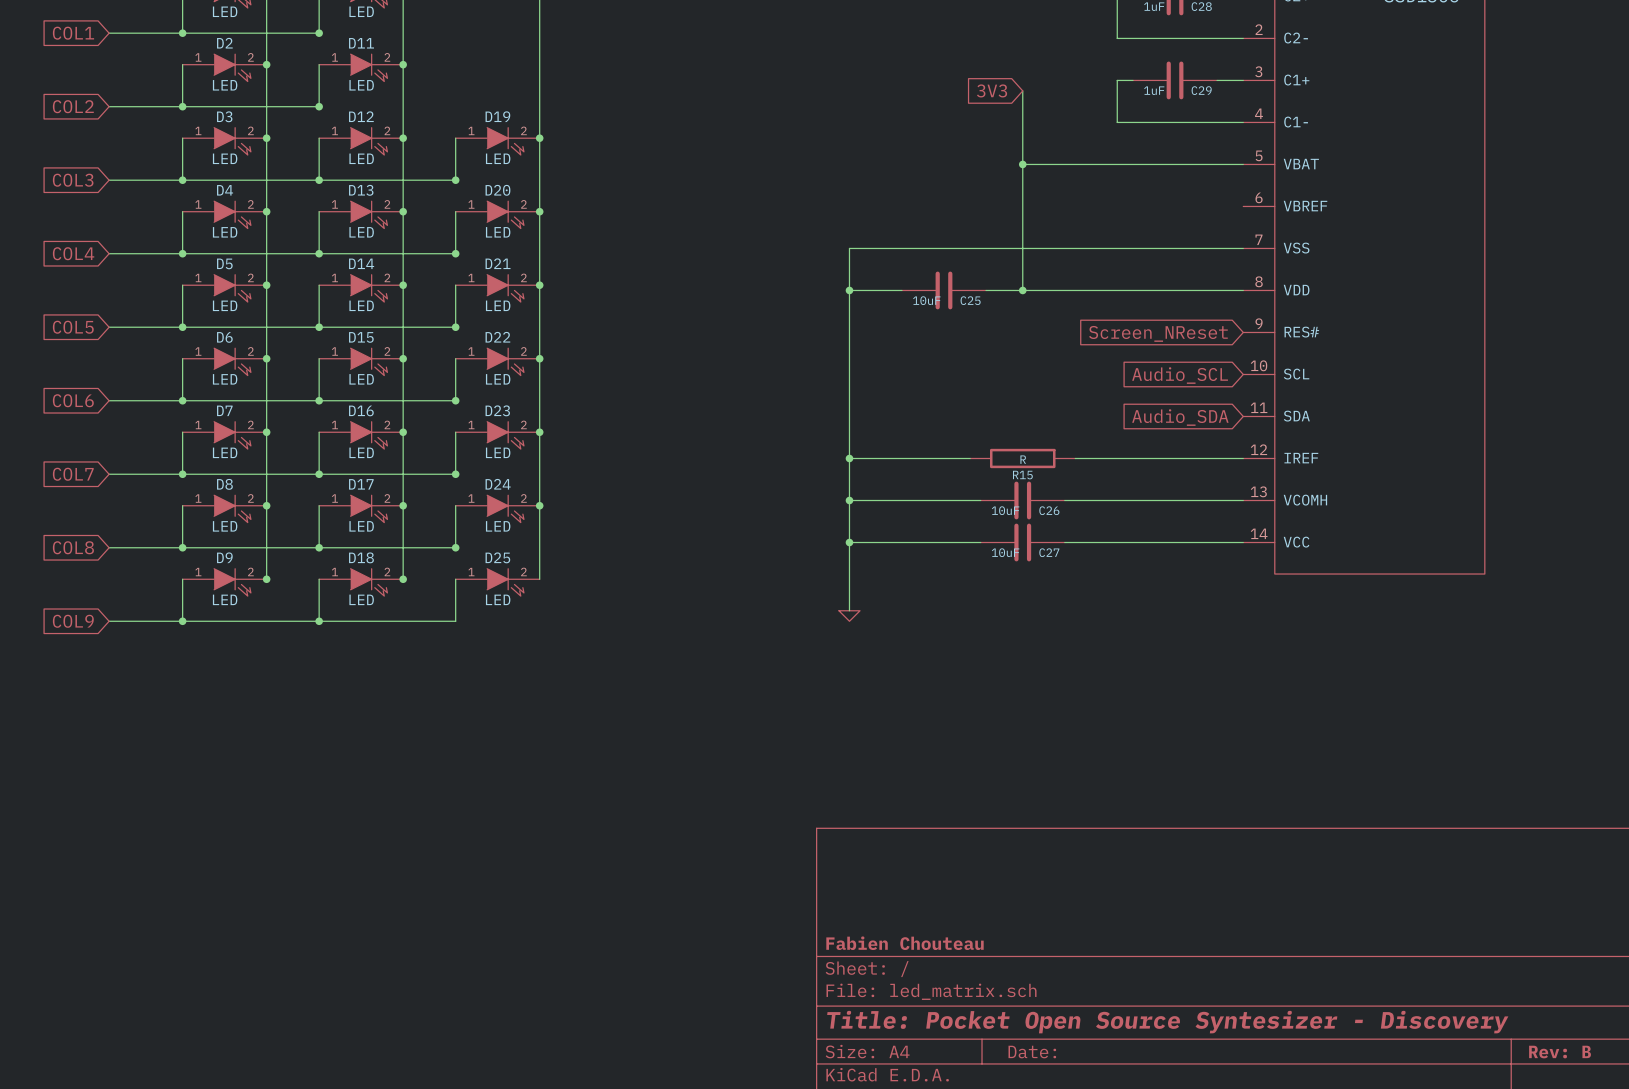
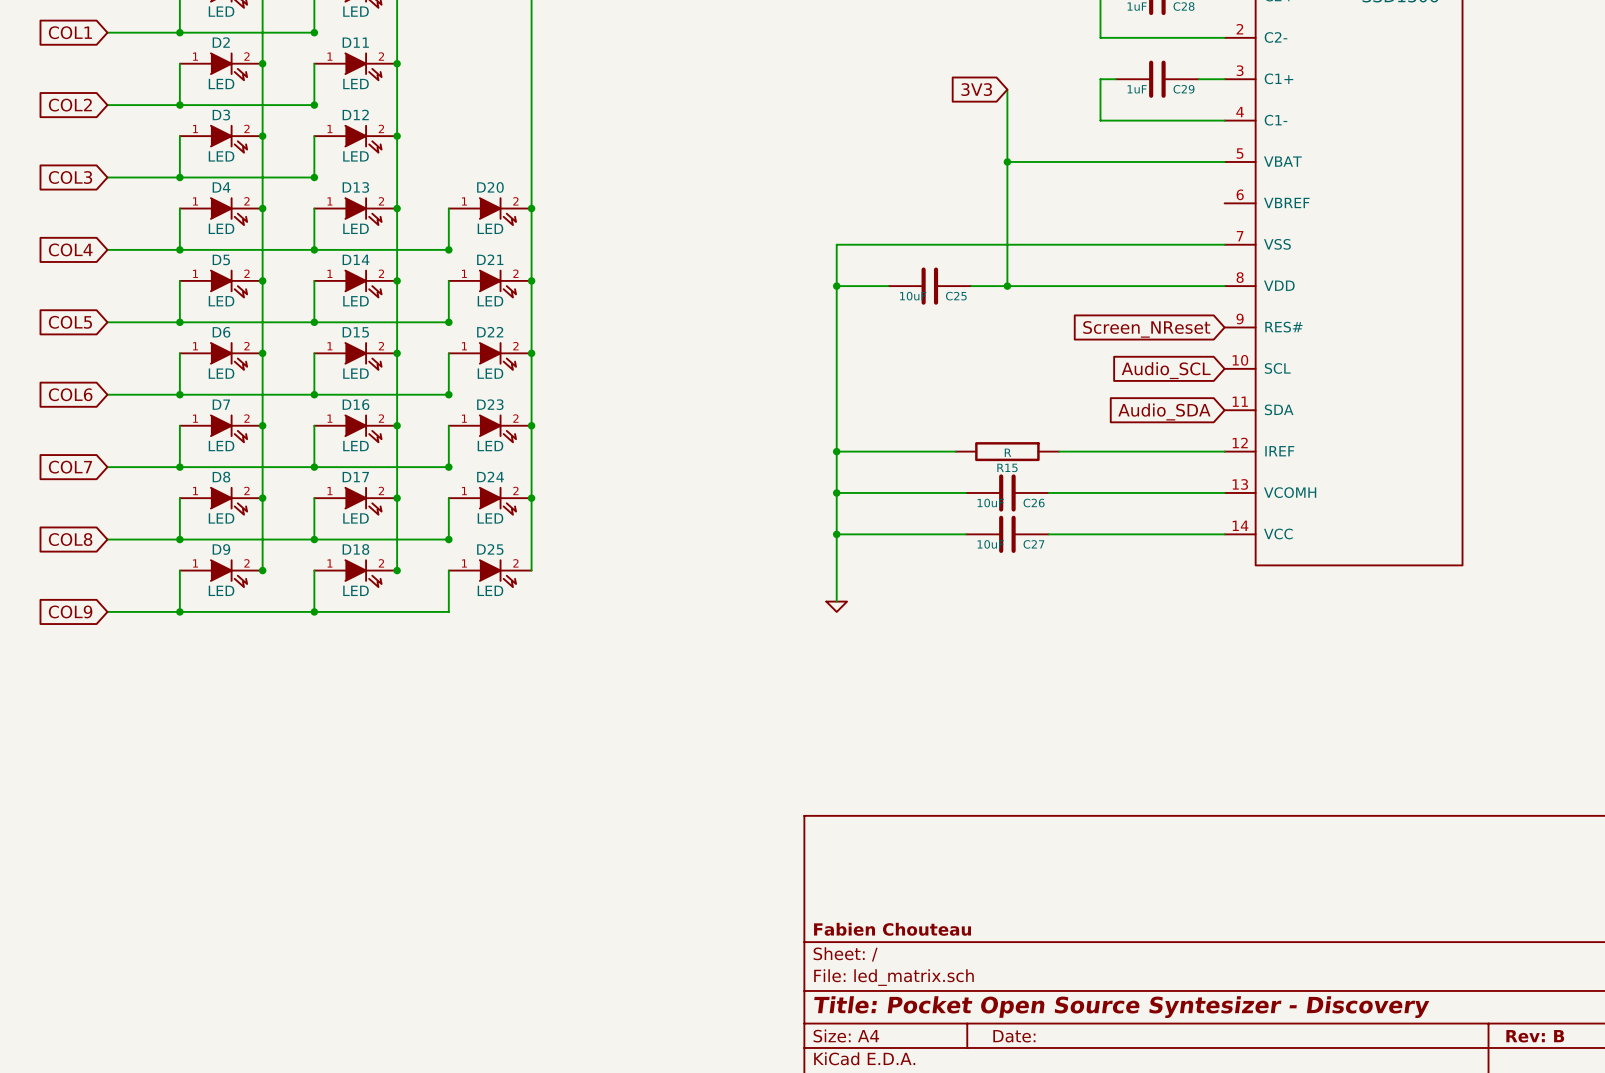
wire: (455, 138) (455, 180) (319, 180) -> none
junction: (539, 138) -> none
D19: LED (497, 141) -> none
junction: (455, 180) -> none

